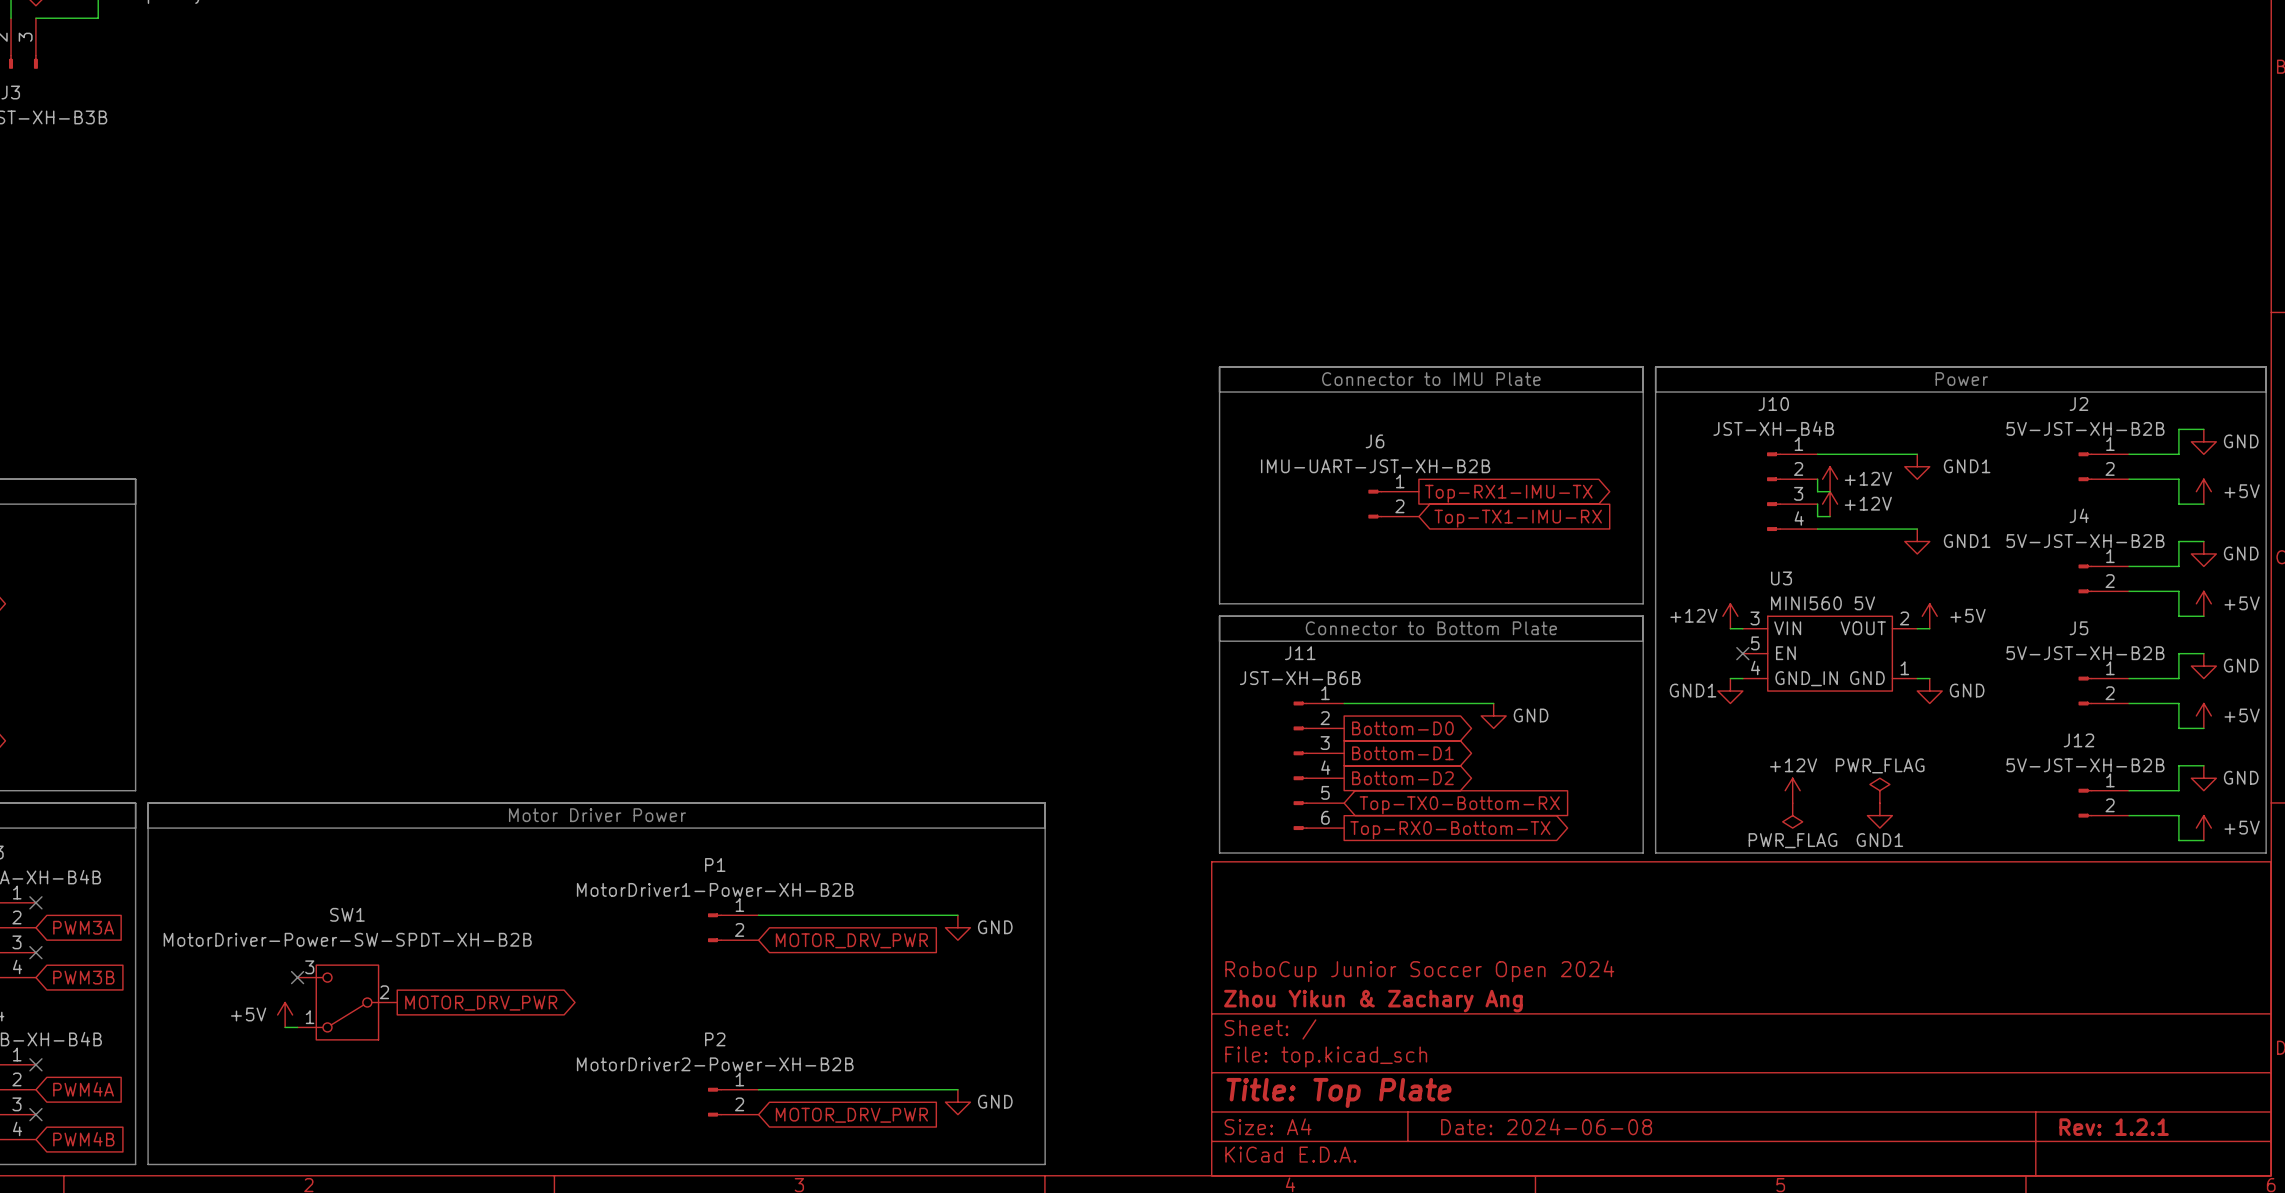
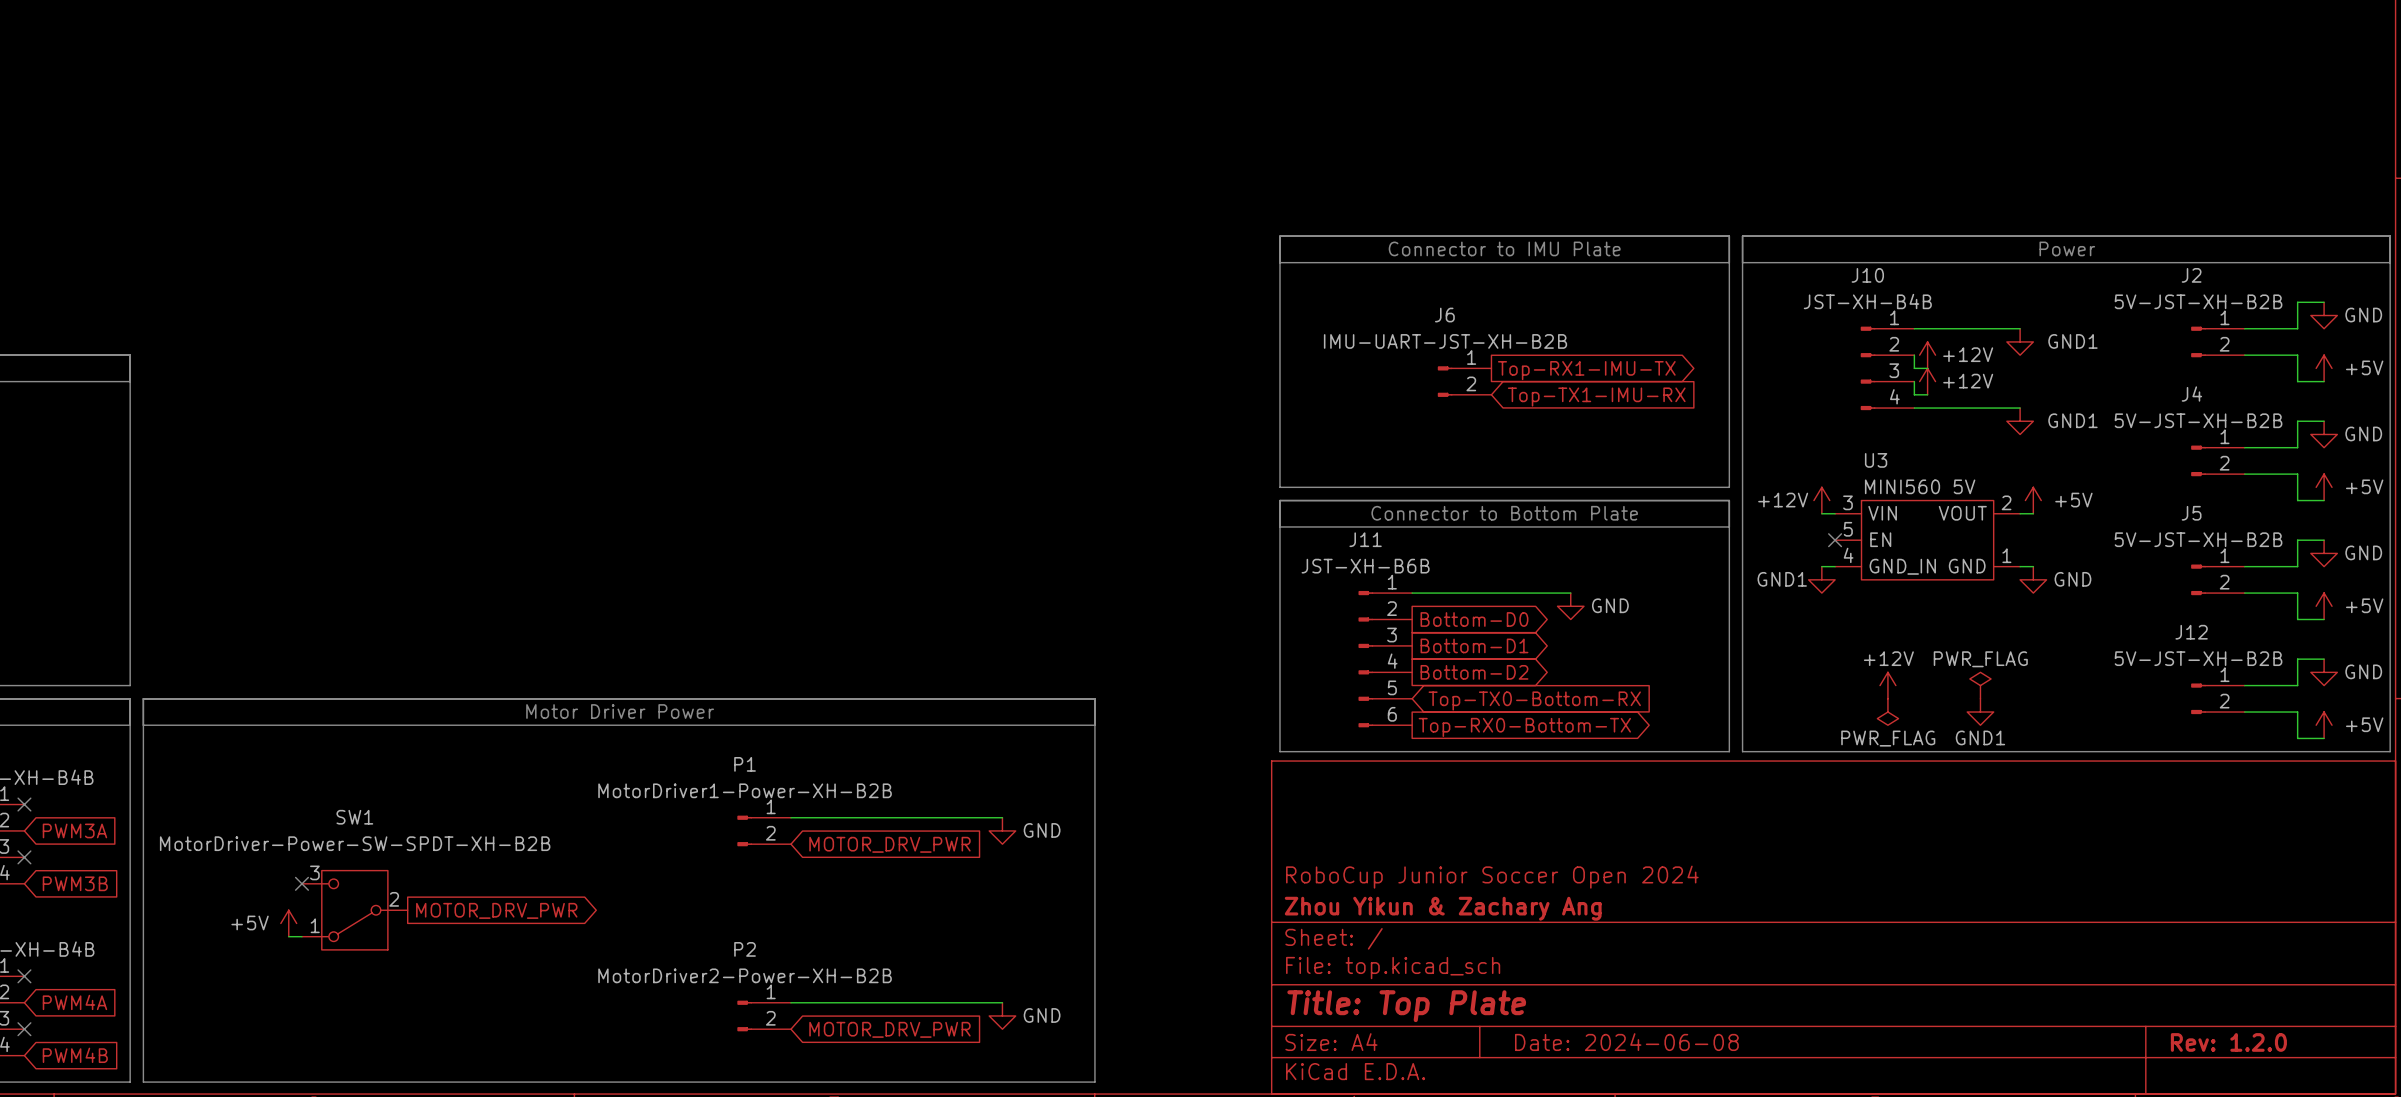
title block: Rev: 1.2.1 (2114, 1127) -> Rev: 1.2.0 (2228, 1042)

